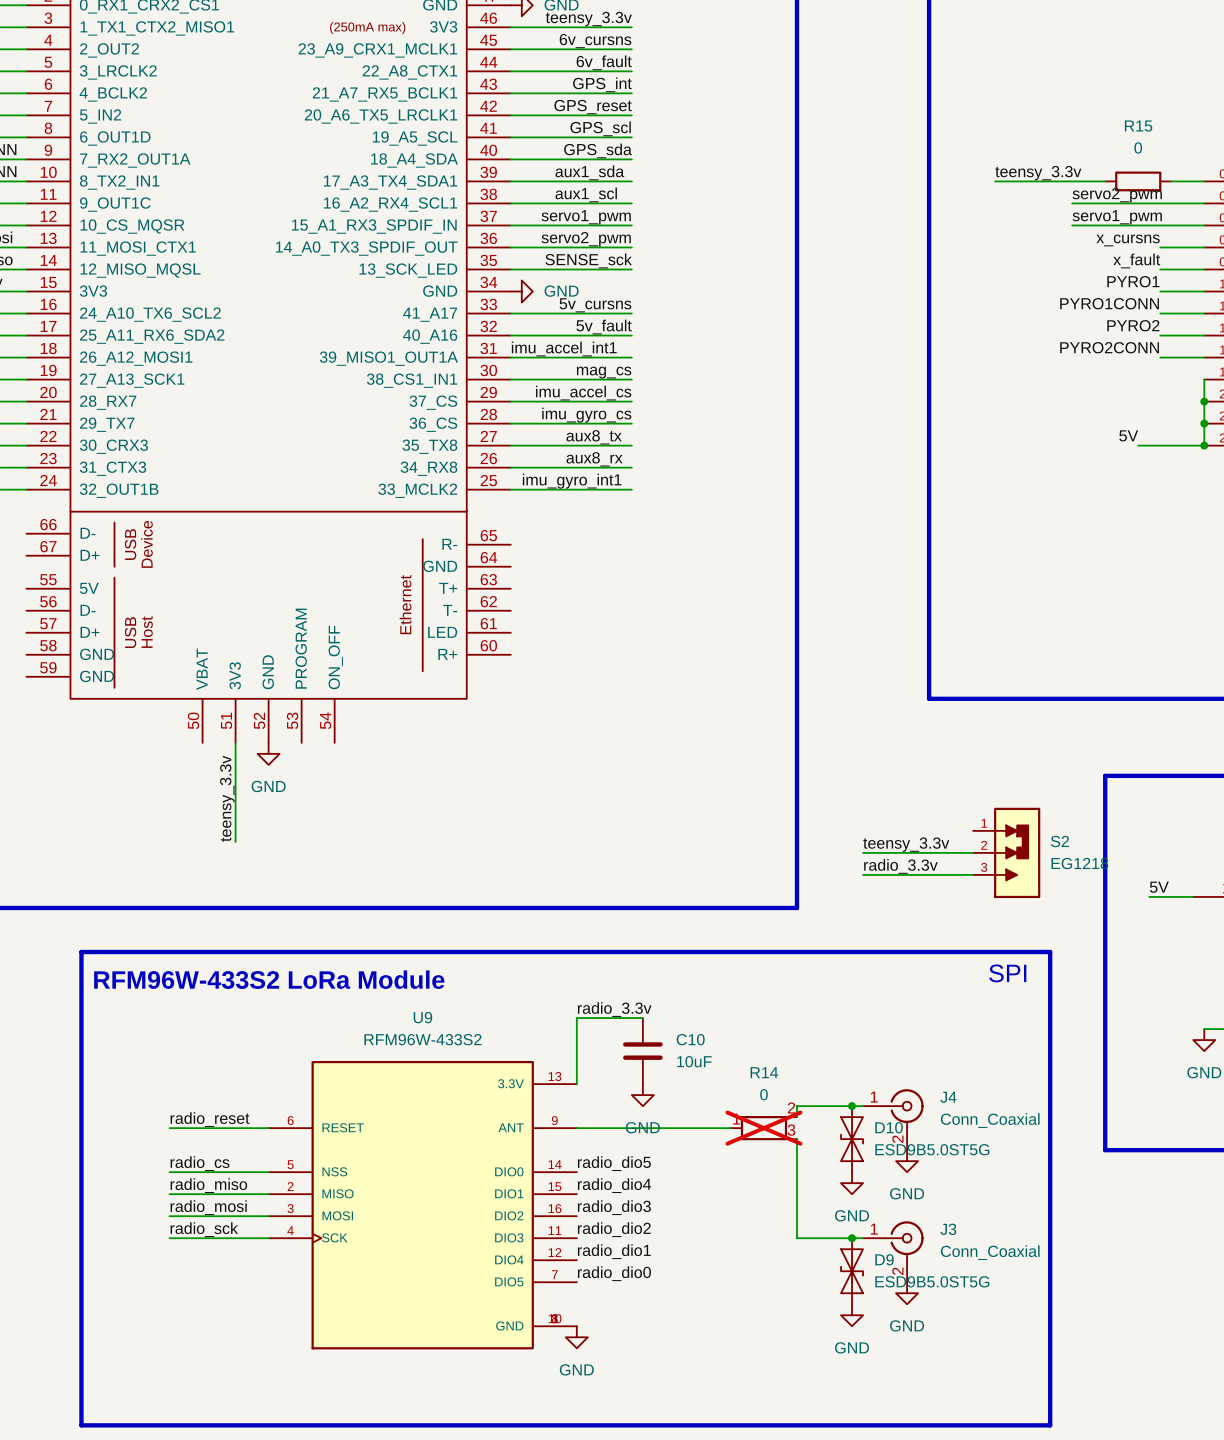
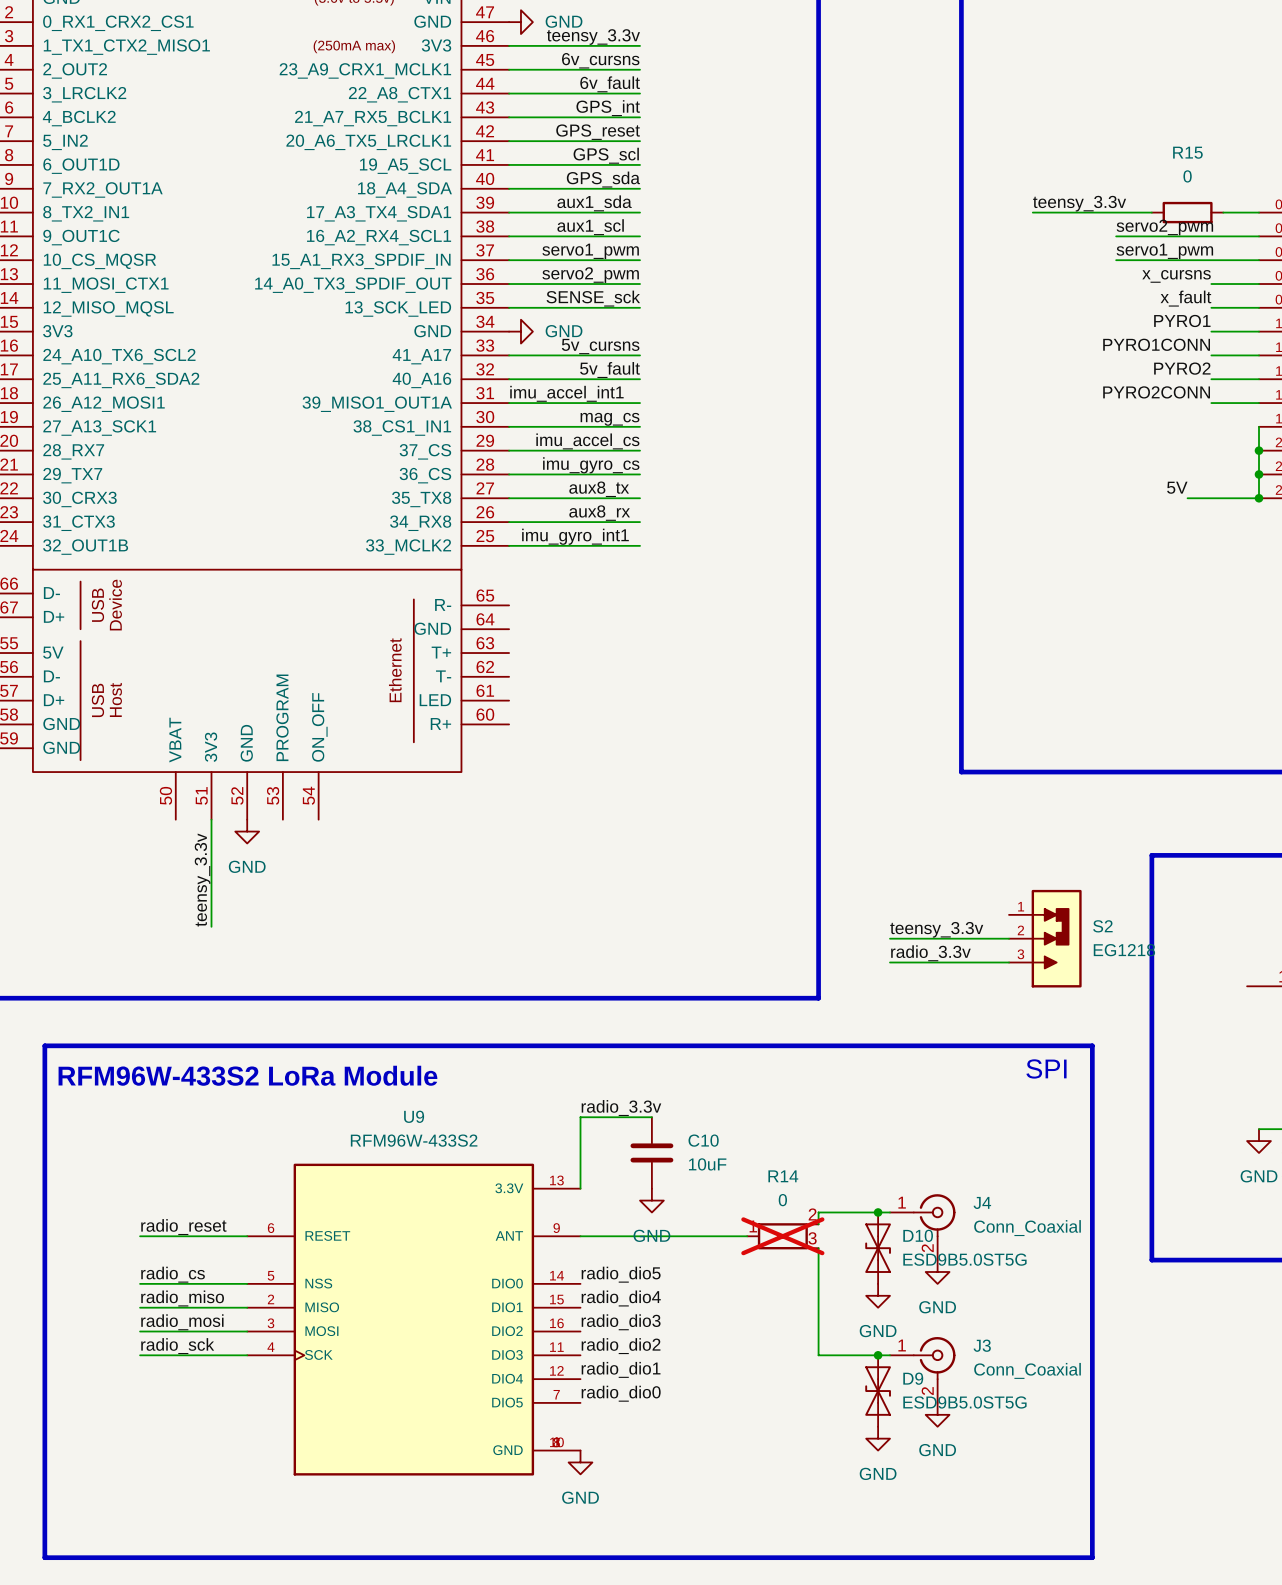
label: 5V (1159, 887) -> none
wire: (1149, 896) (1193, 896) -> none

